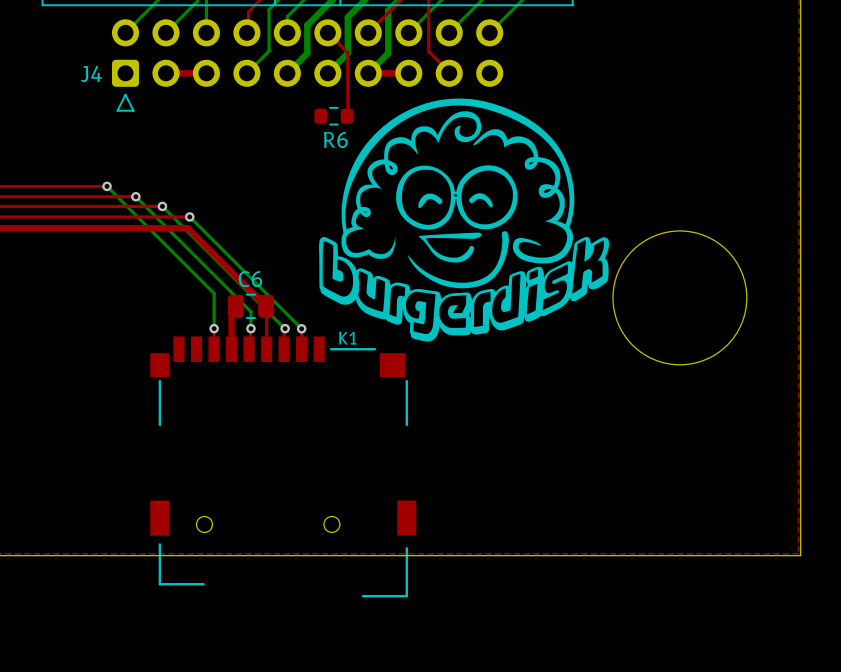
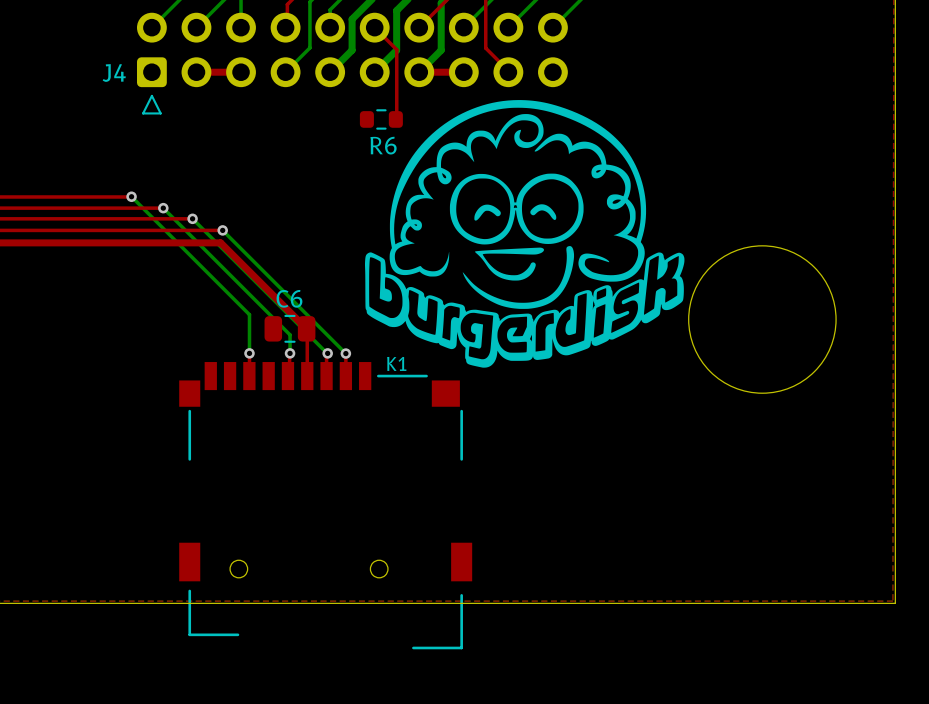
top track: (235, 306) (231, 310) (231, 349) -> none

